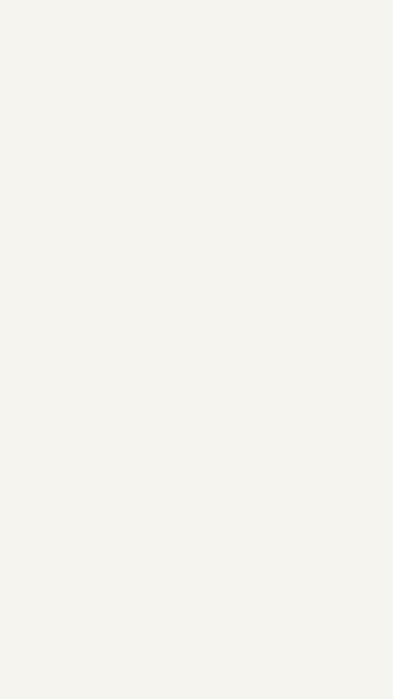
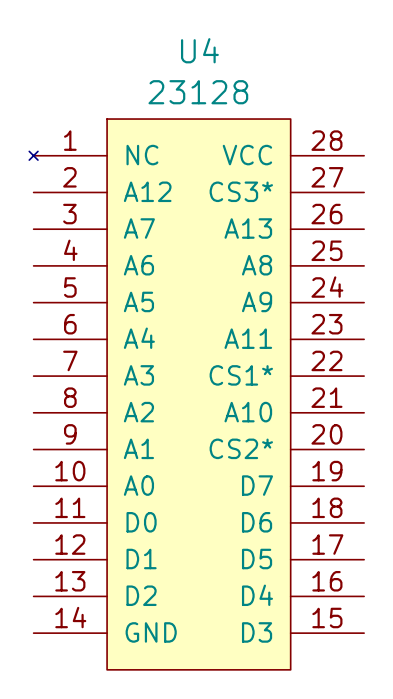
U4: none -> 23128 (196, 394)

